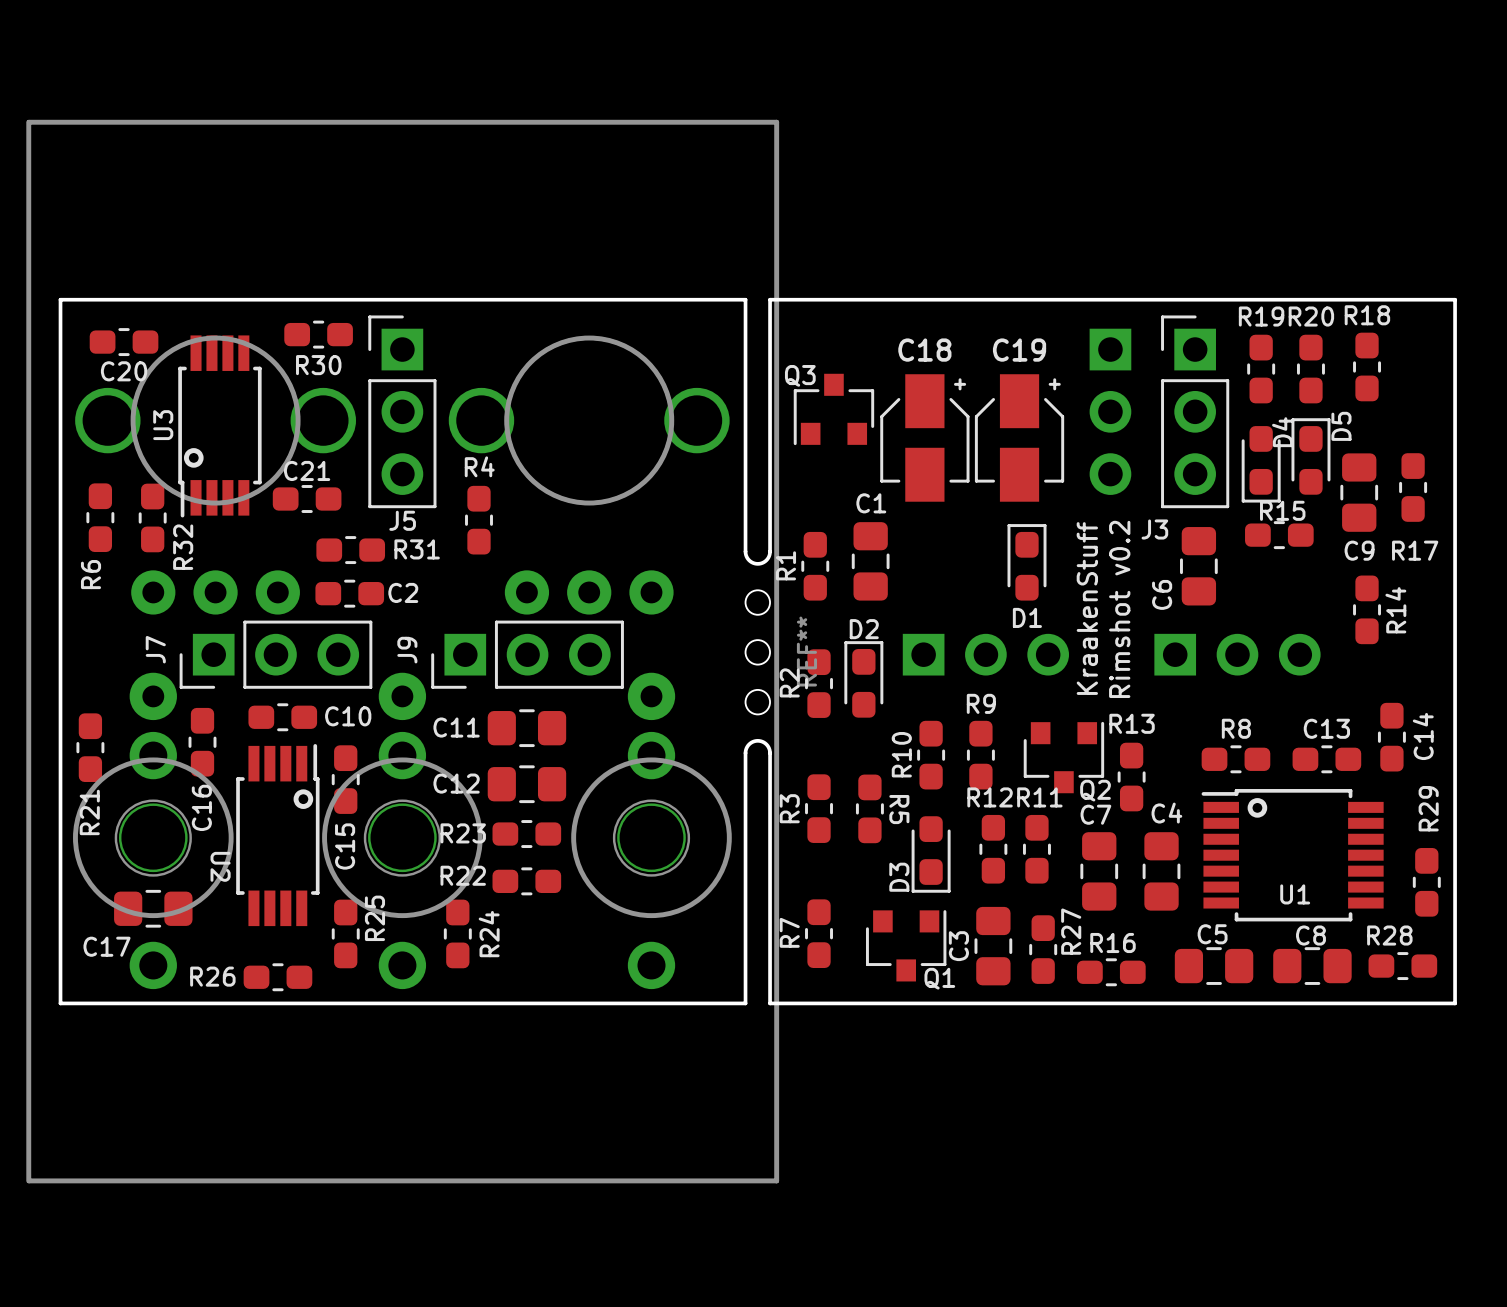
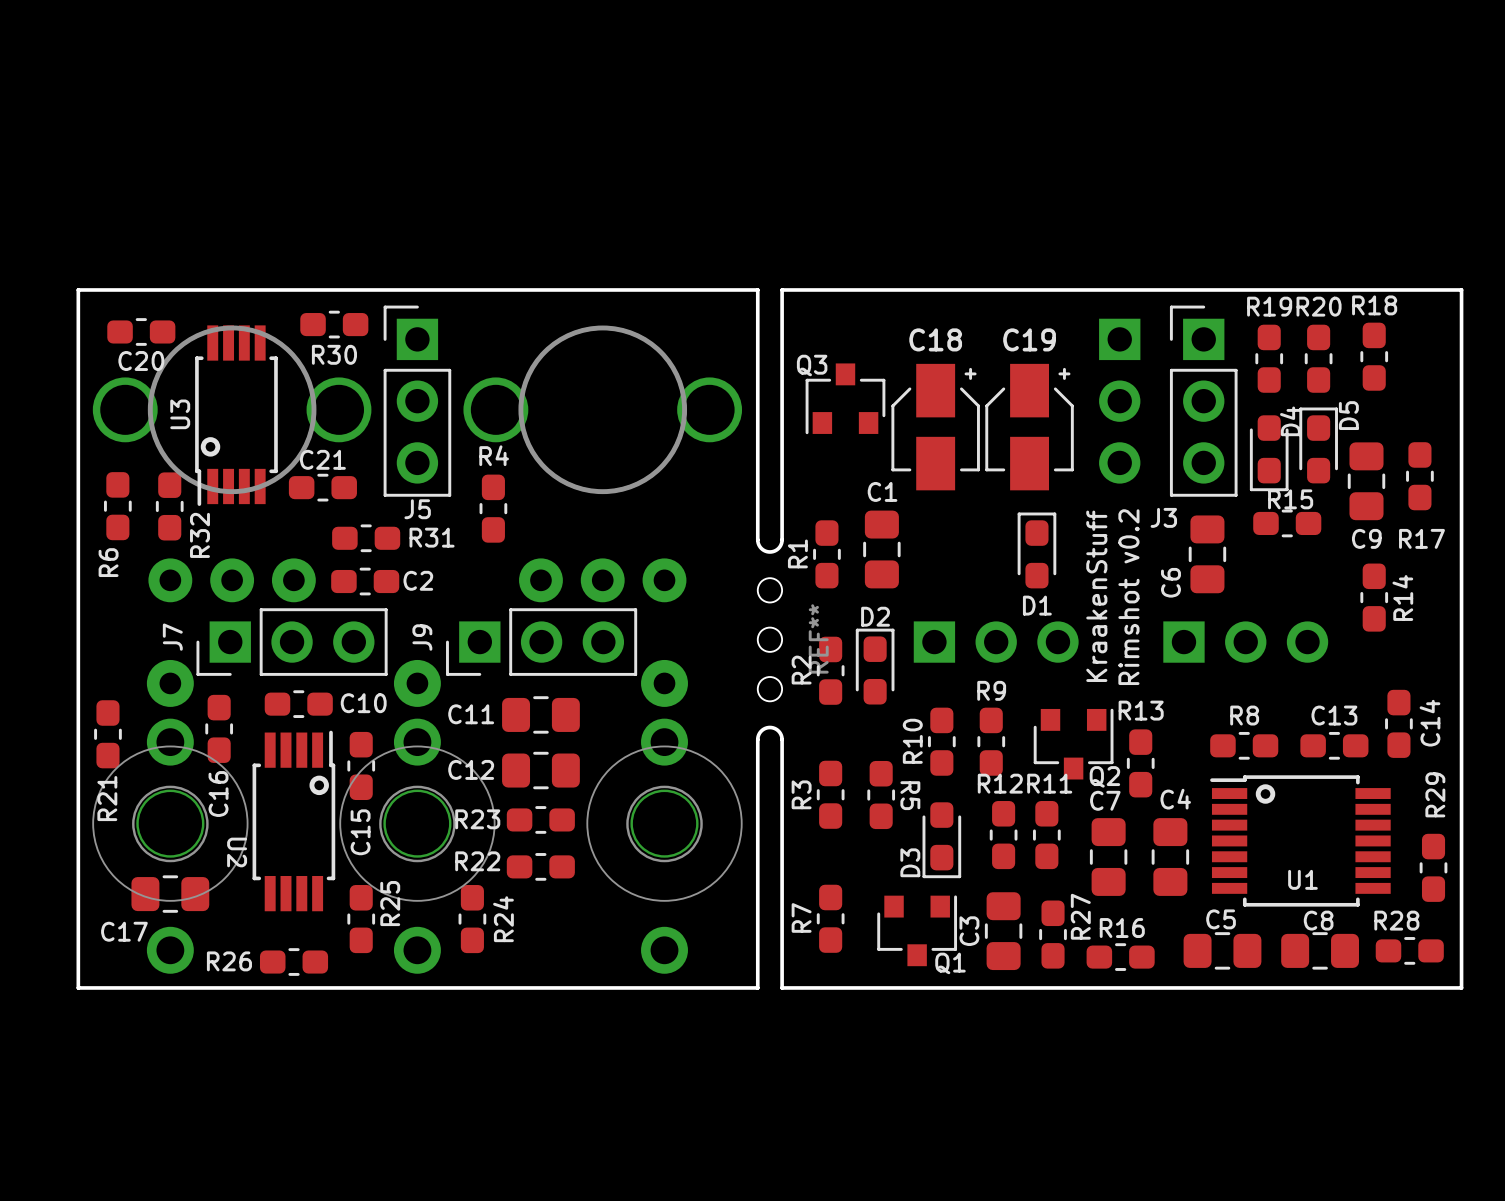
line: (28, 122) (28, 1180) -> none
line: (29, 122) (776, 122) (776, 1180) (29, 1180) -> none
drawing: [73, 757, 234, 919] -> none
drawing: [322, 757, 483, 919] -> none
drawing: [571, 757, 732, 919] -> none

